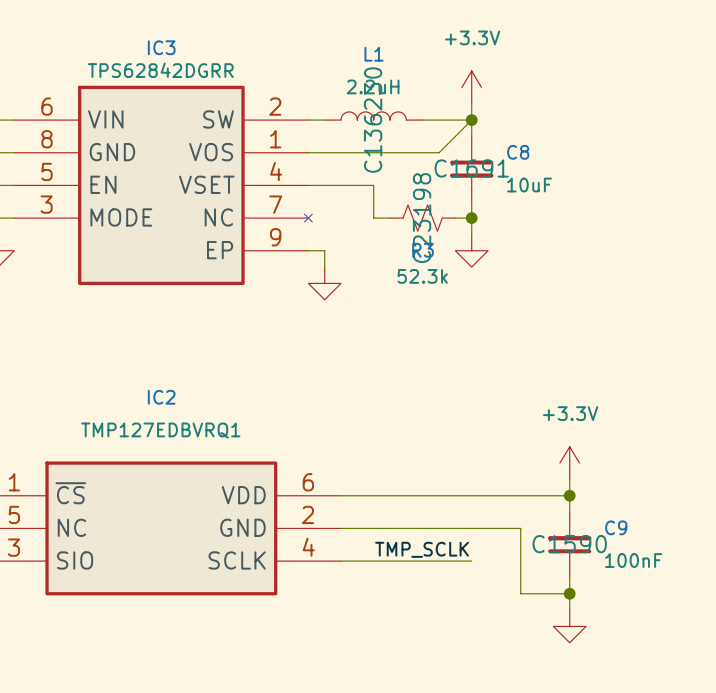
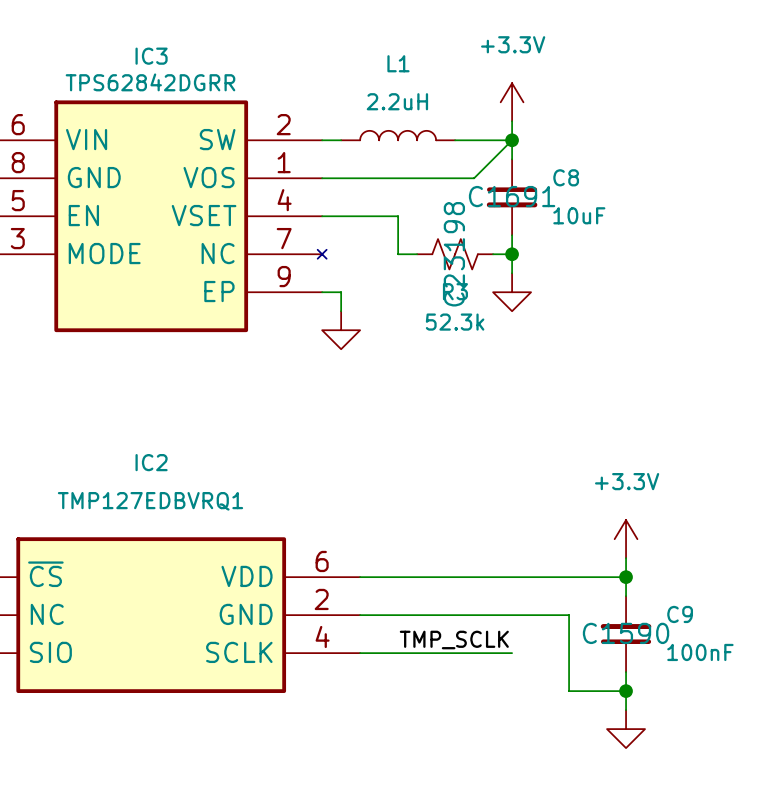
L1 text: C136230 (373, 120) -> none

